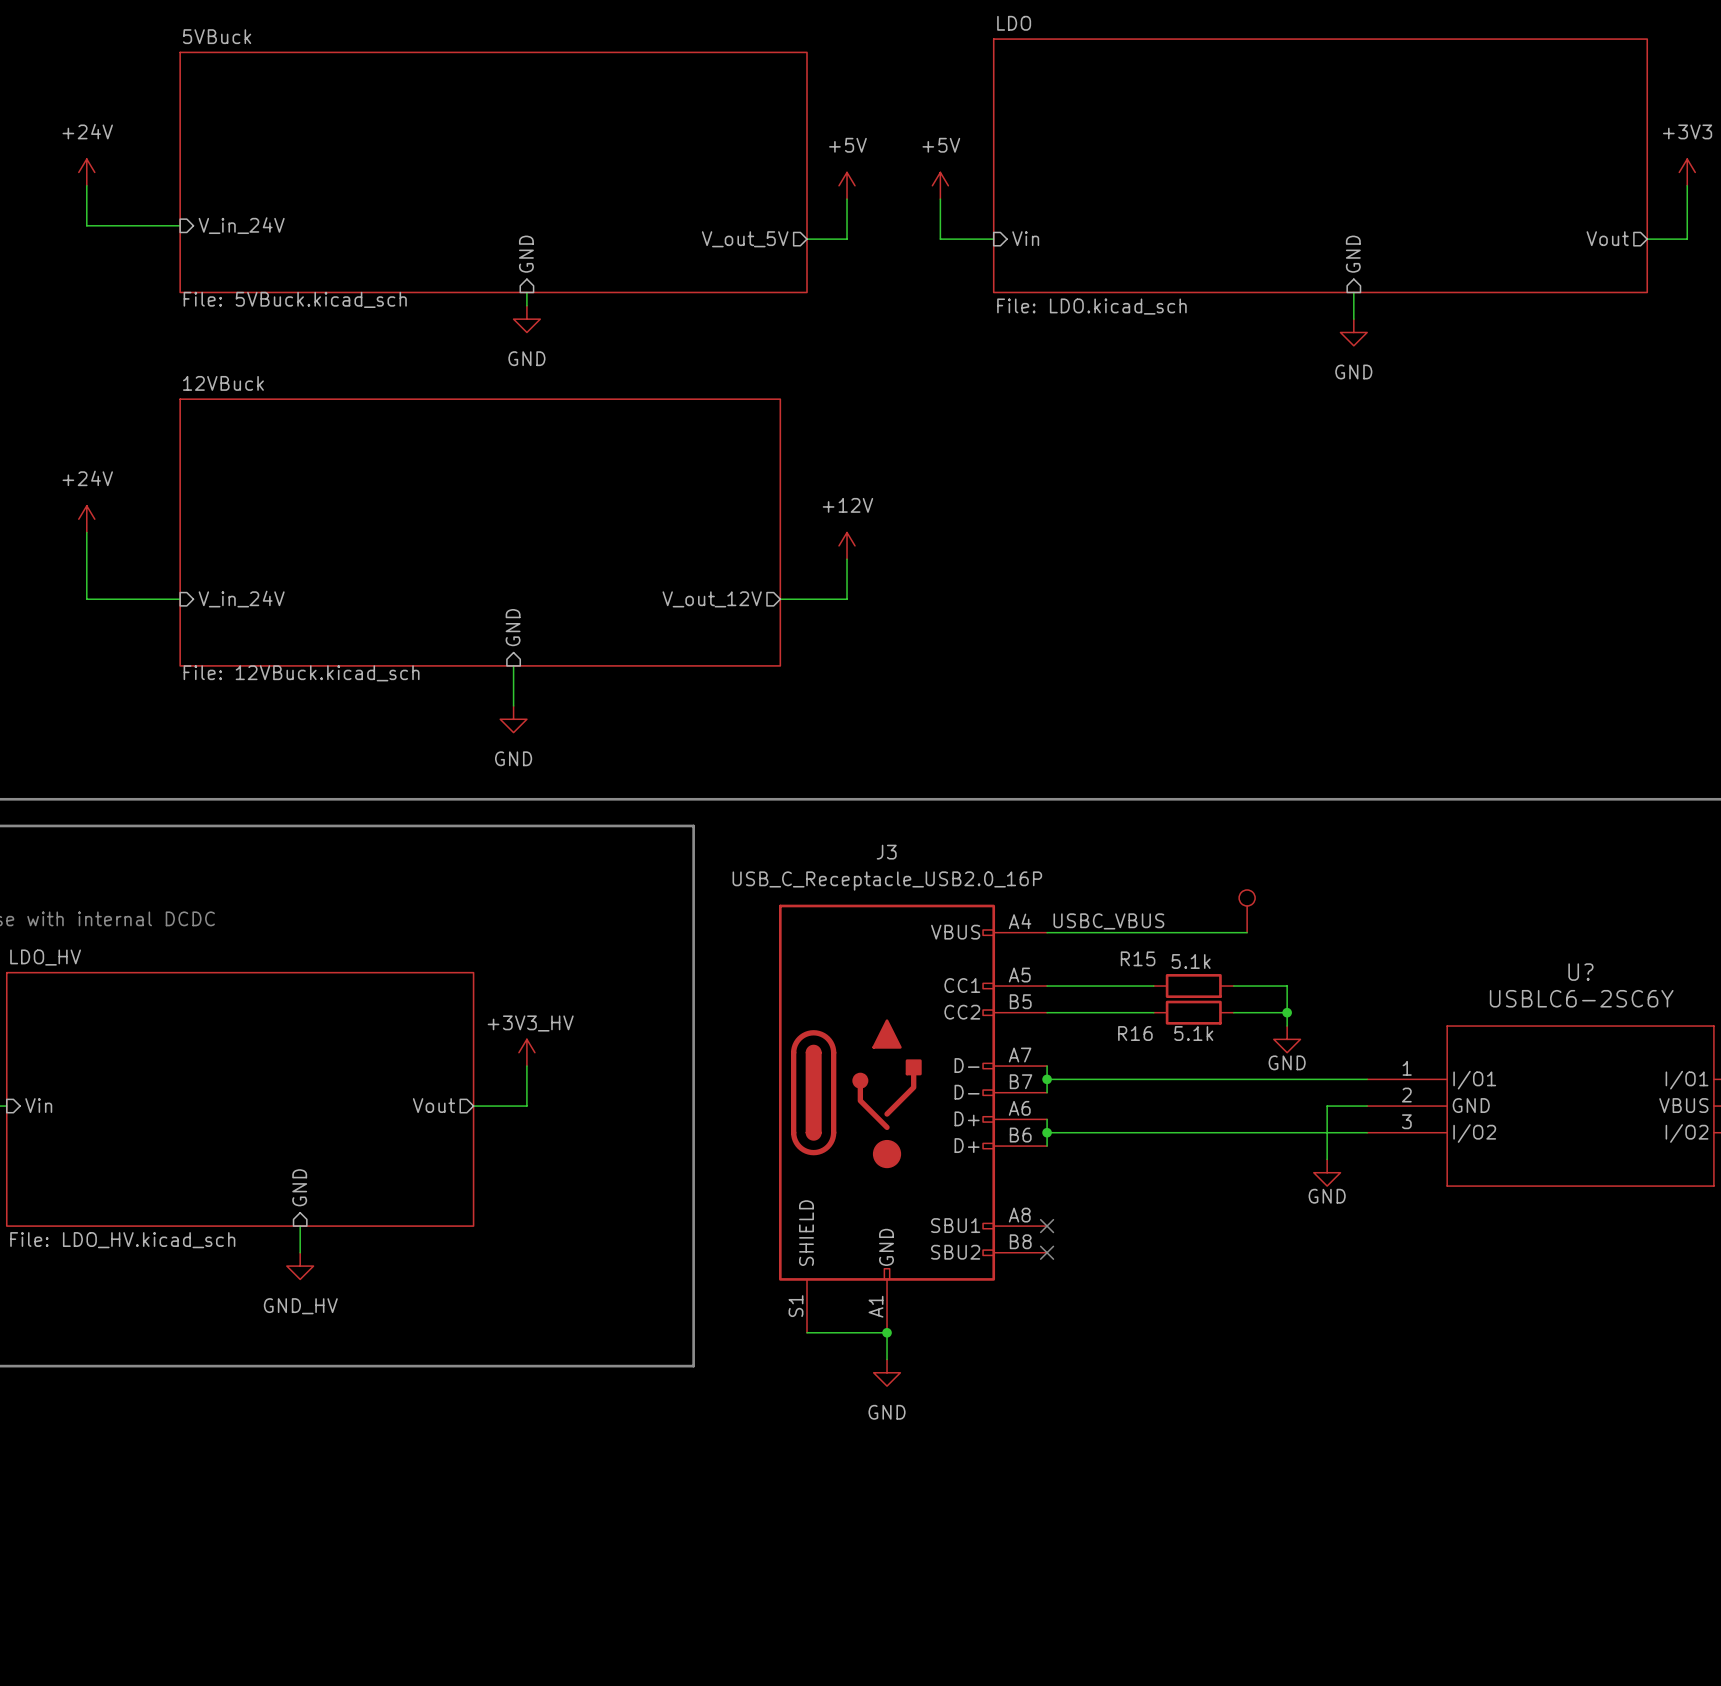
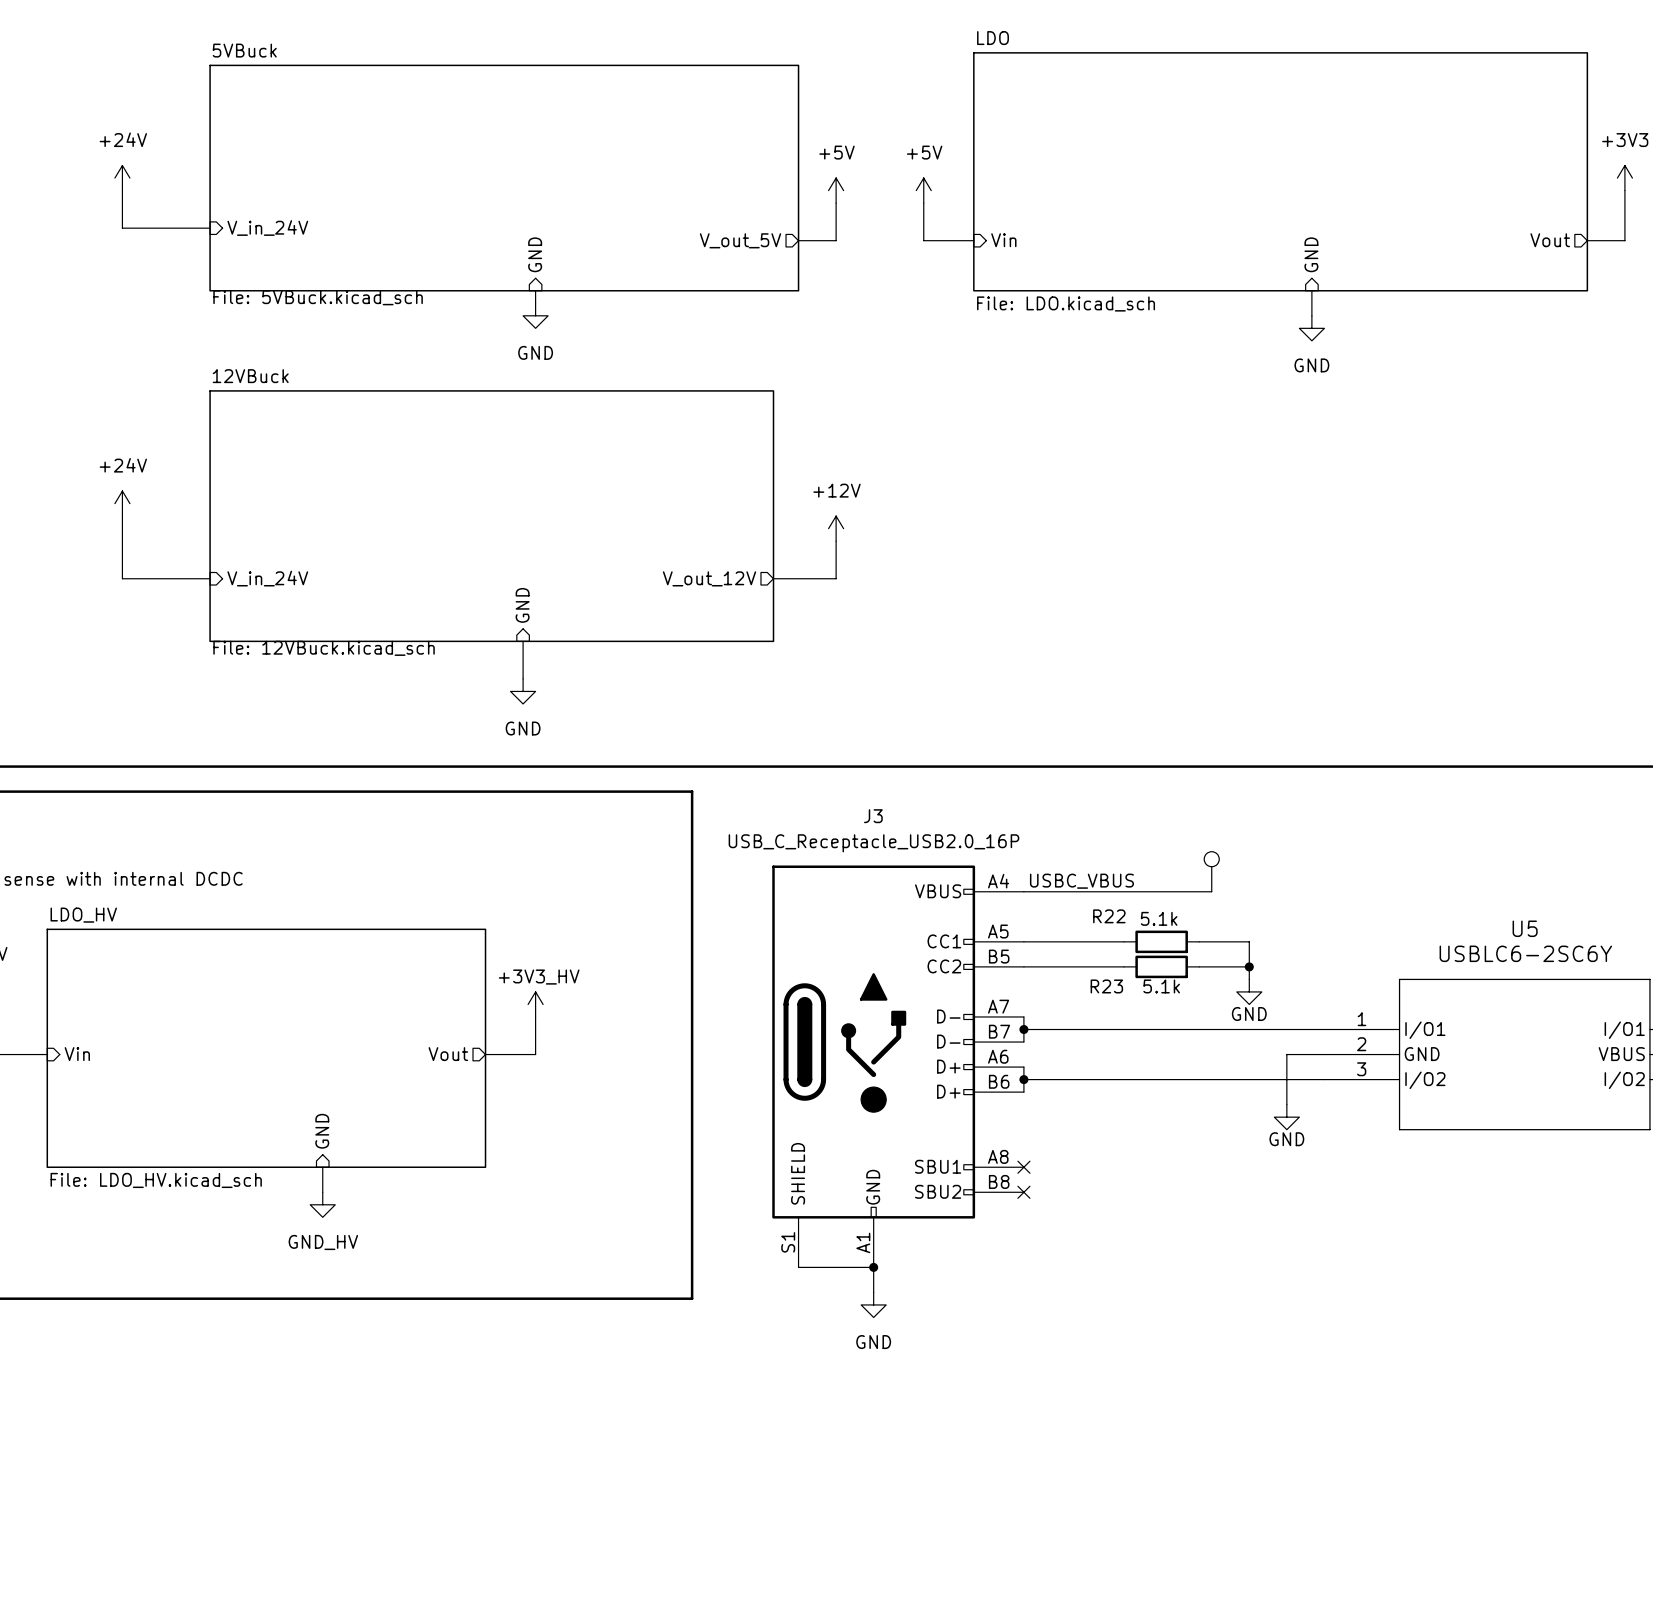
R15 name: R15 (1138, 958) -> R22 (1109, 916)
U? name: U? (1580, 972) -> U5 (1525, 928)
R16 name: R16 (1135, 1033) -> R23 (1106, 986)

